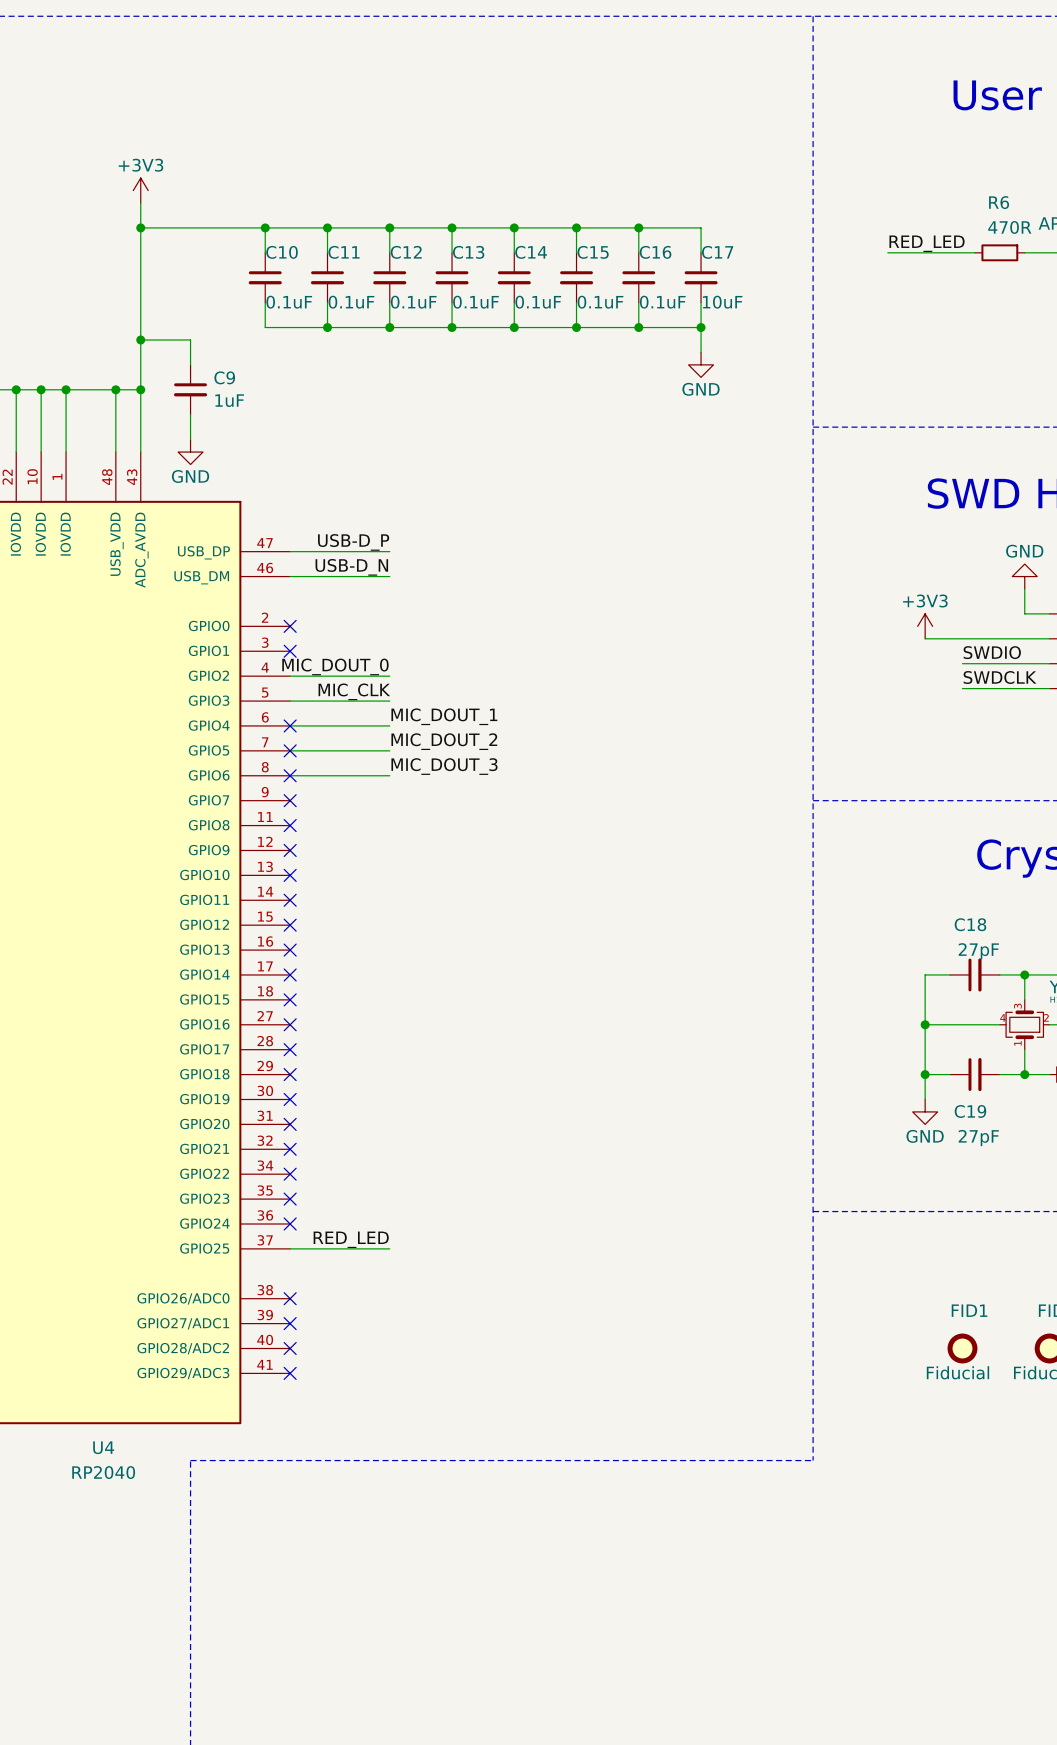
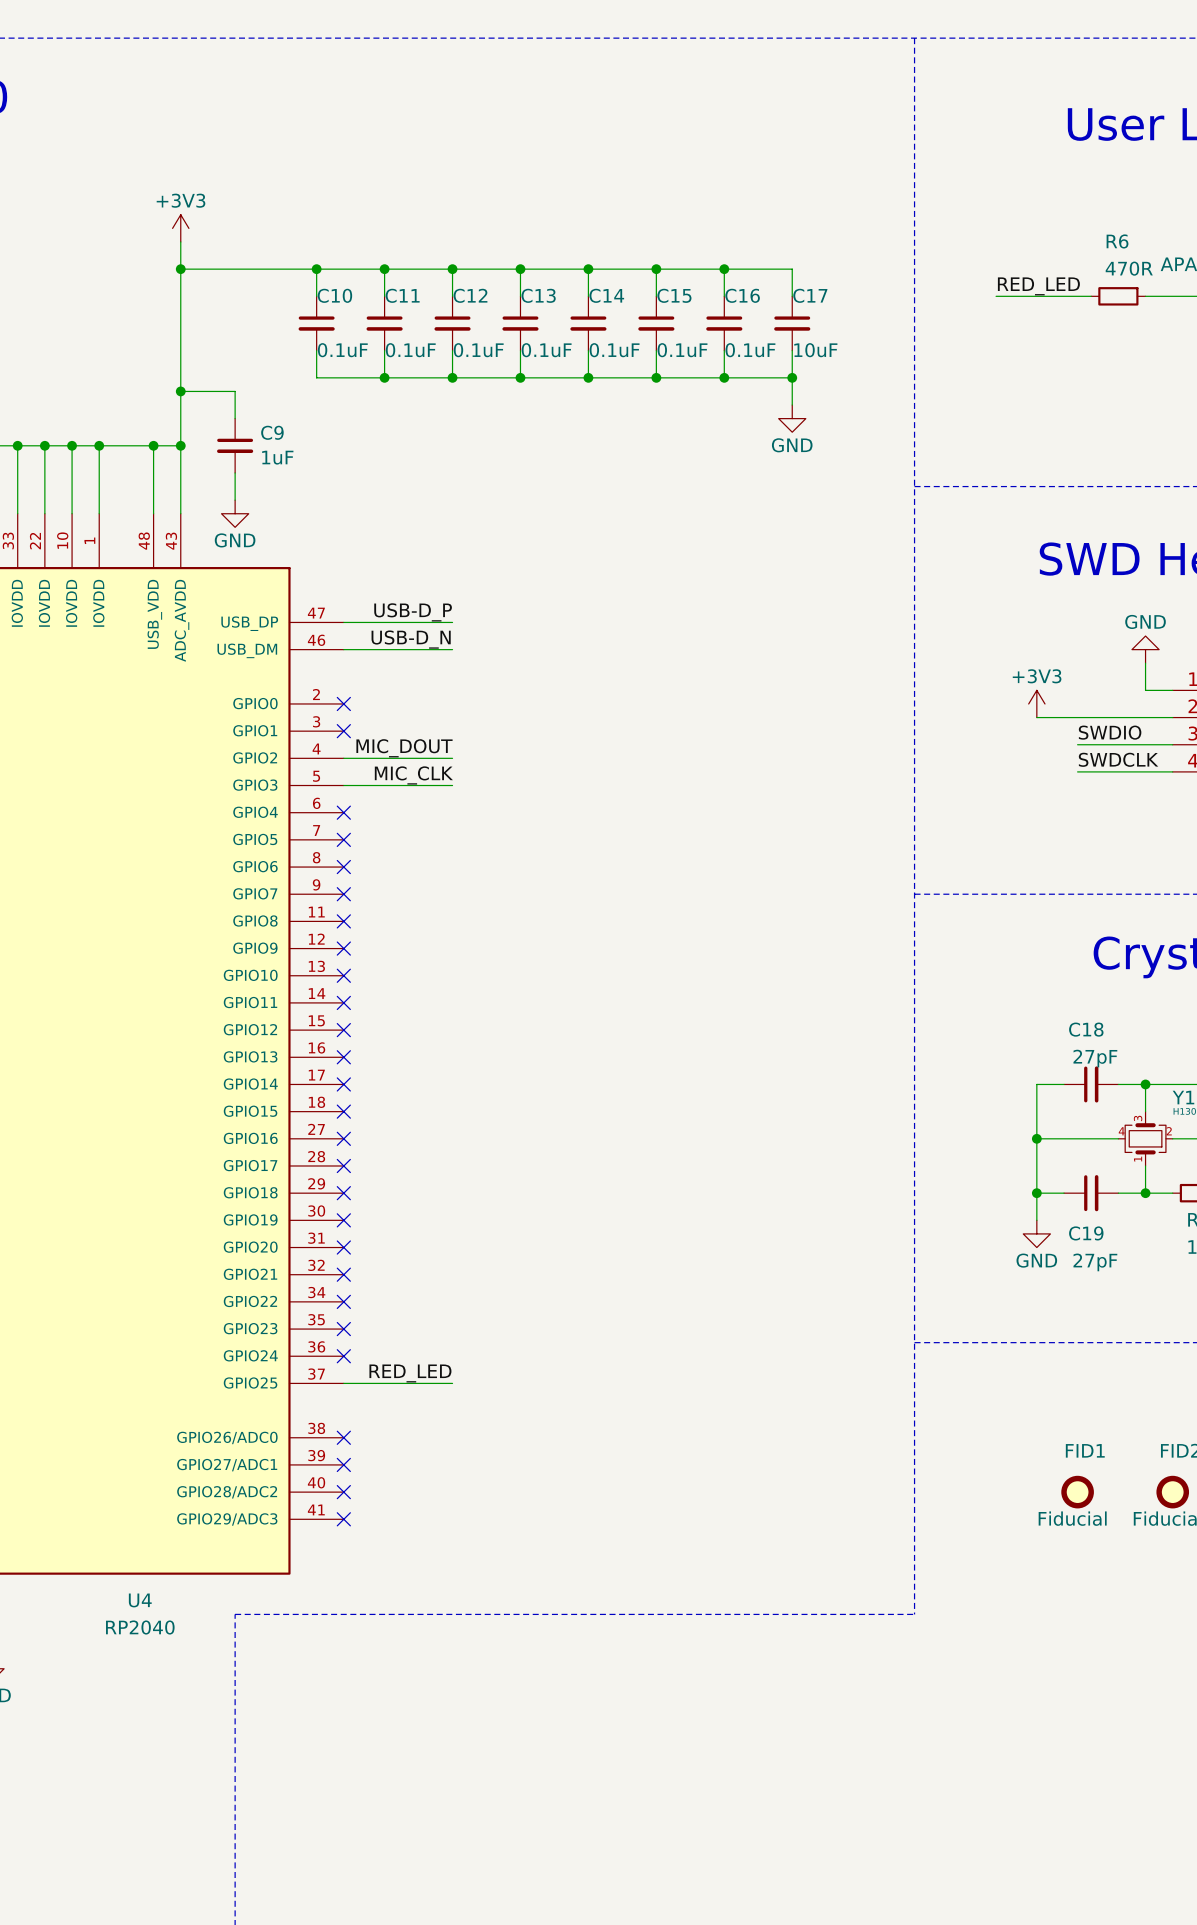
label: MIC_DOUT_0 (335, 666) -> MIC_DOUT (404, 748)
label: MIC_DOUT_1 (444, 716) -> none
wire: (290, 725) (389, 725) -> none
label: MIC_DOUT_2 (444, 741) -> none
wire: (290, 750) (389, 750) -> none
label: MIC_DOUT_3 (444, 766) -> none
wire: (290, 775) (389, 775) -> none

